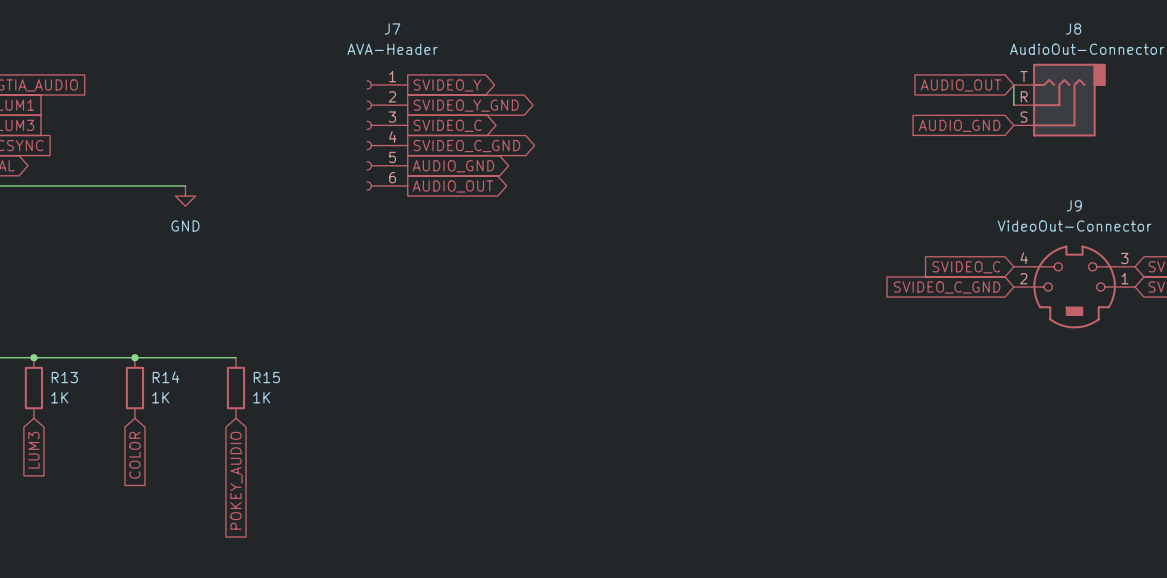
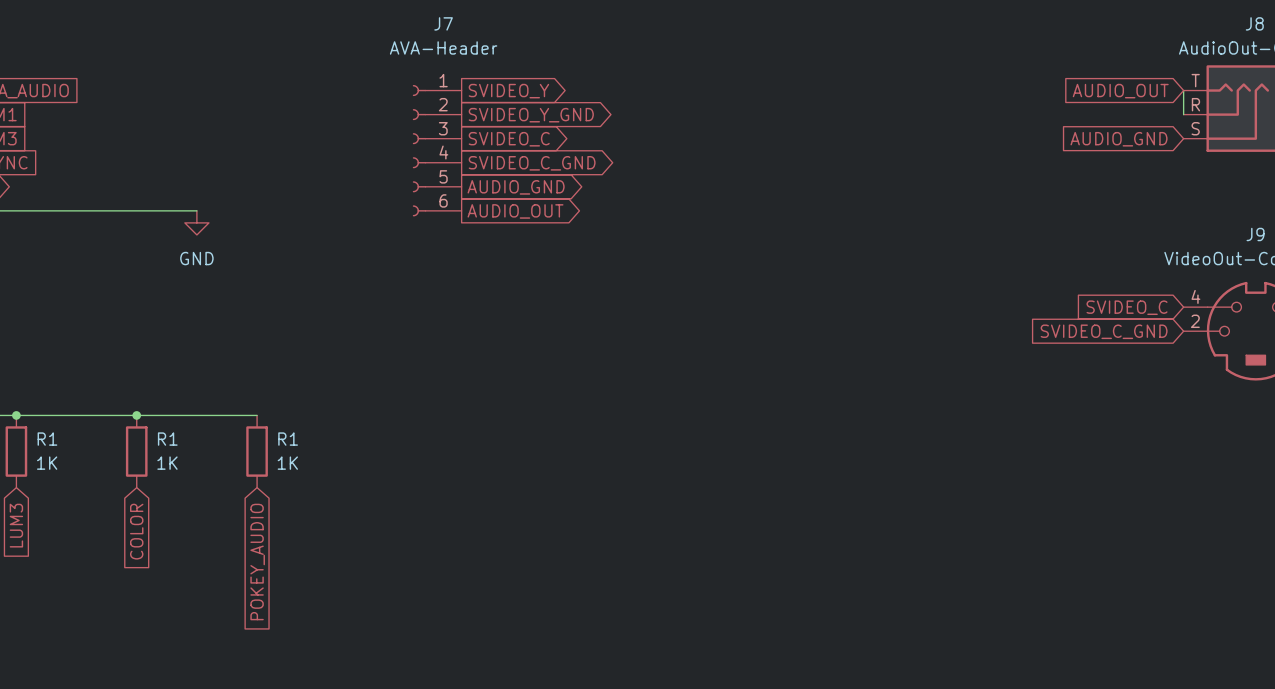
R13 name: R13 (64, 377) -> R1 (47, 439)
R14 name: R14 (166, 377) -> R1 (167, 439)
R15 name: R15 (266, 377) -> R1 (288, 439)

